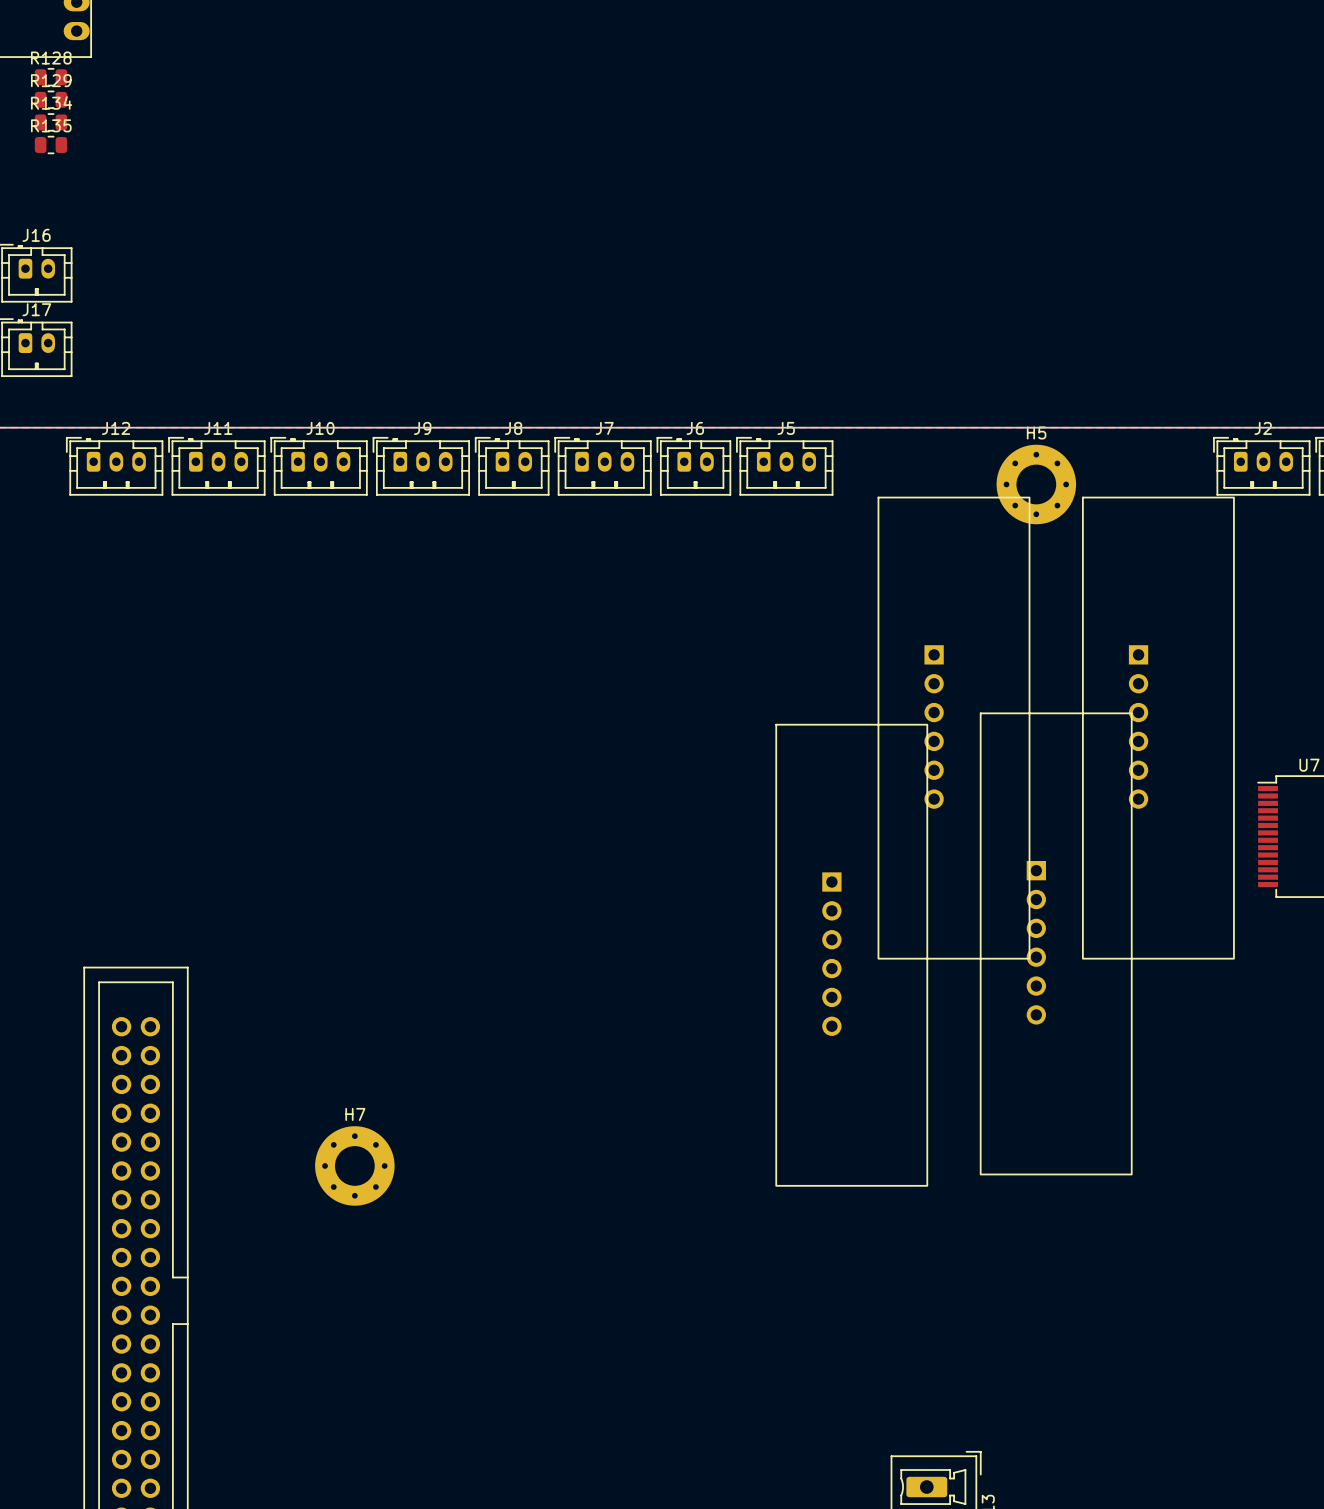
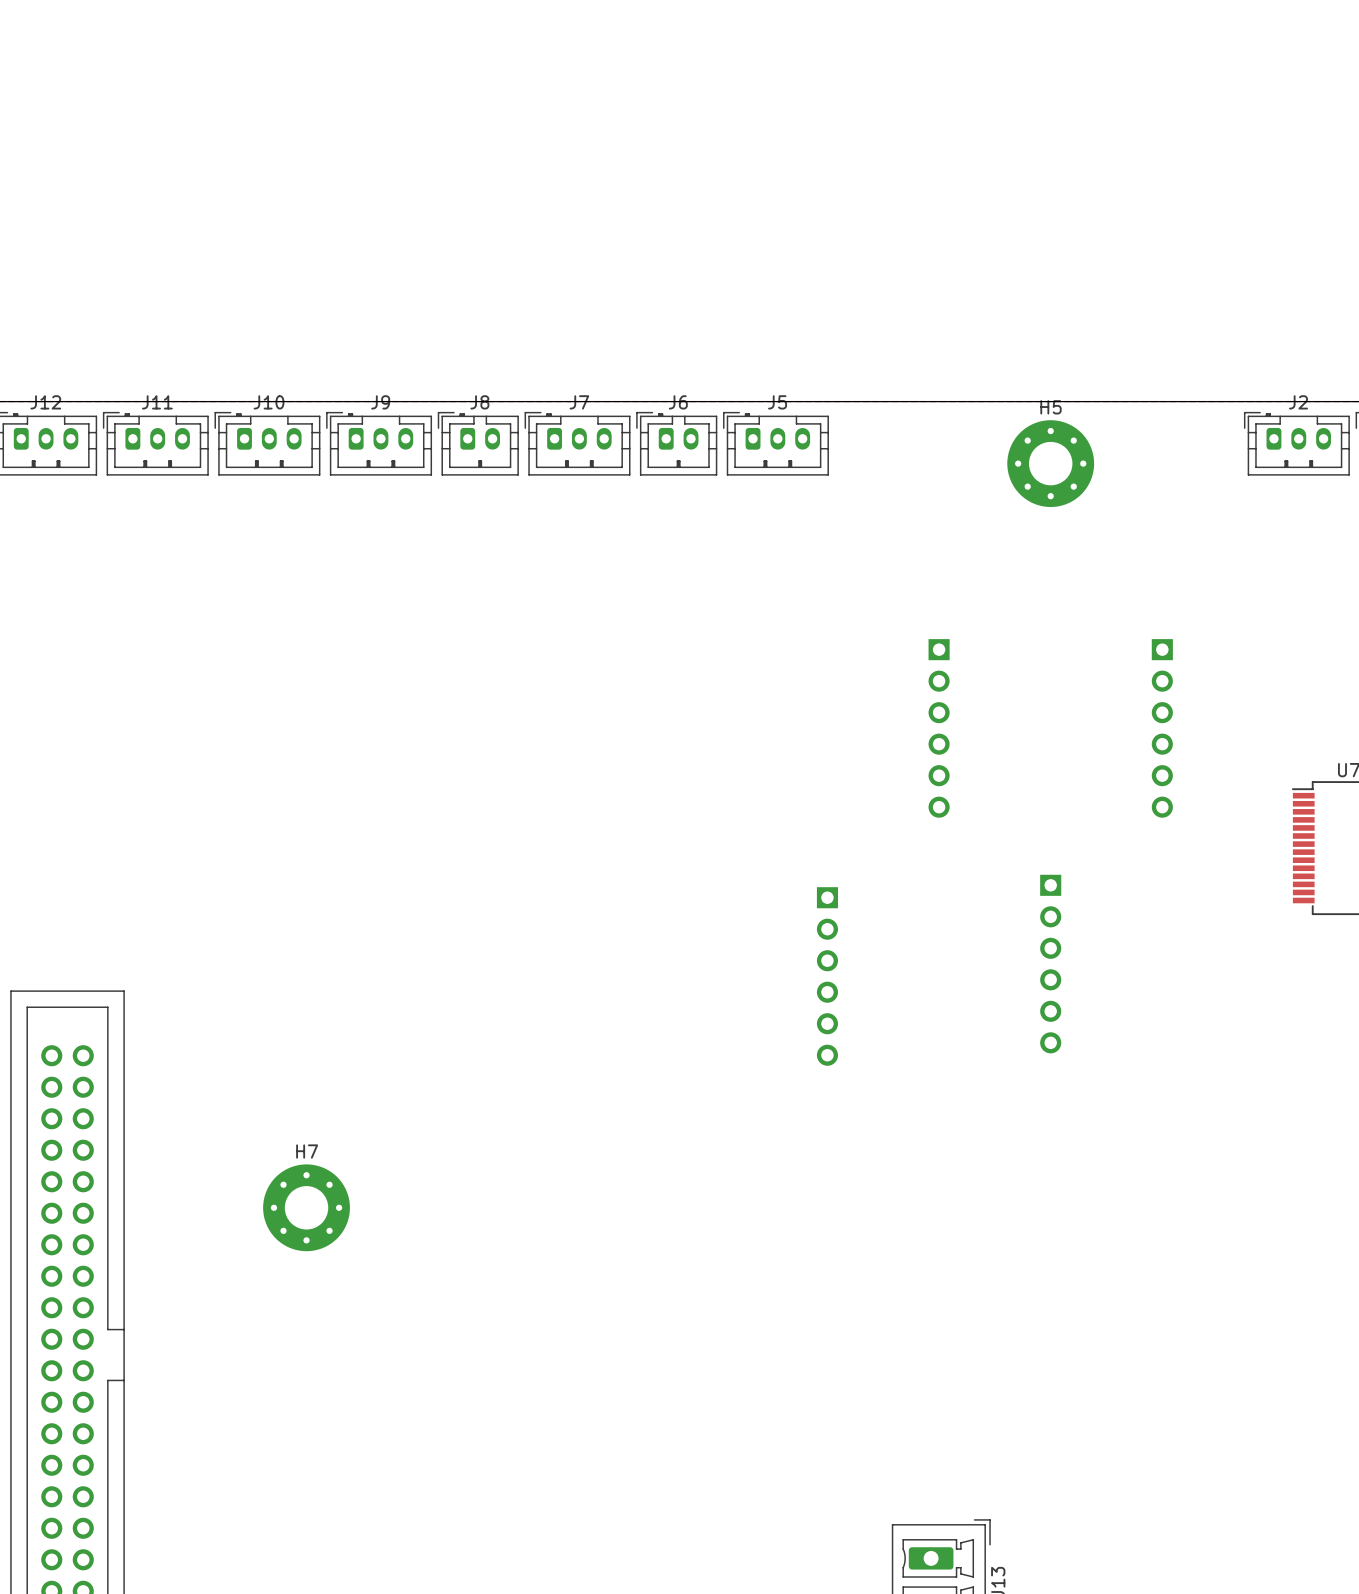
part: none -> (939, 728)
part: none -> (1162, 728)
part: (953, 728) -> none
part: (1158, 728) -> none
part: none -> (1050, 964)
part: (1056, 943) -> none
part: (851, 955) -> none

